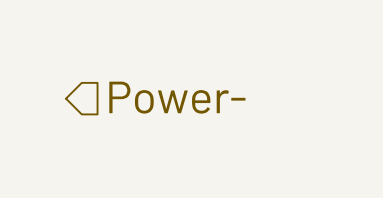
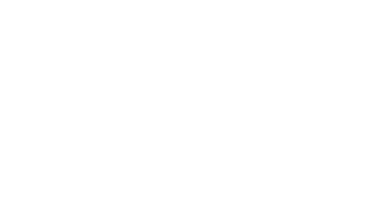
hierarchical label: Power- (177, 97) -> none

